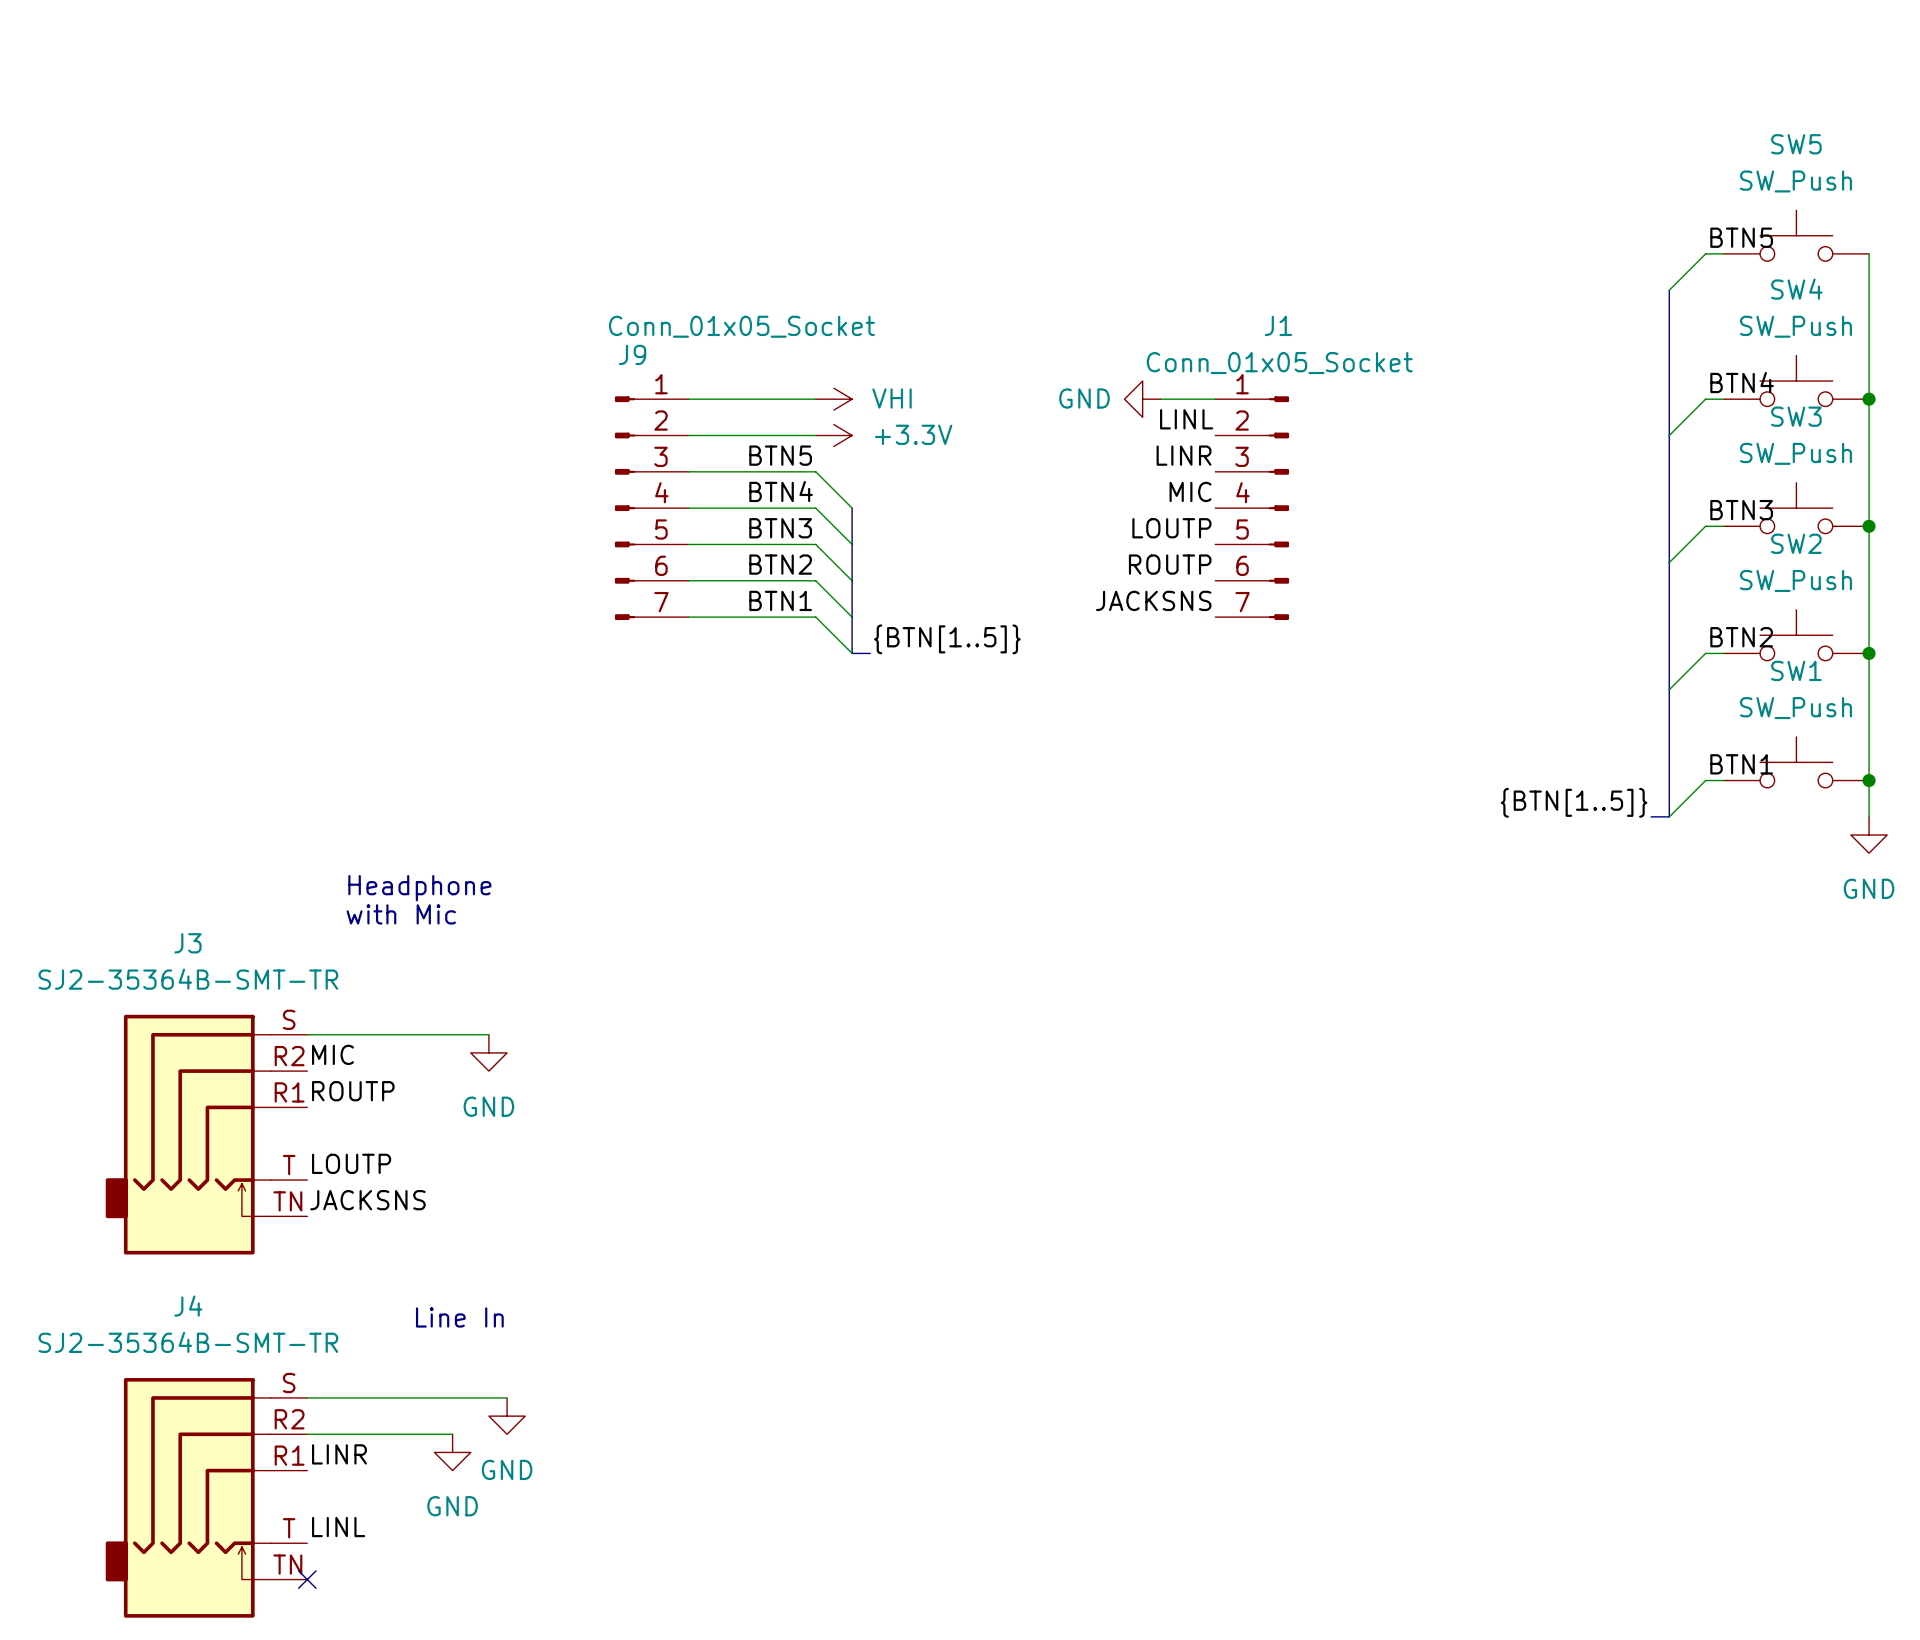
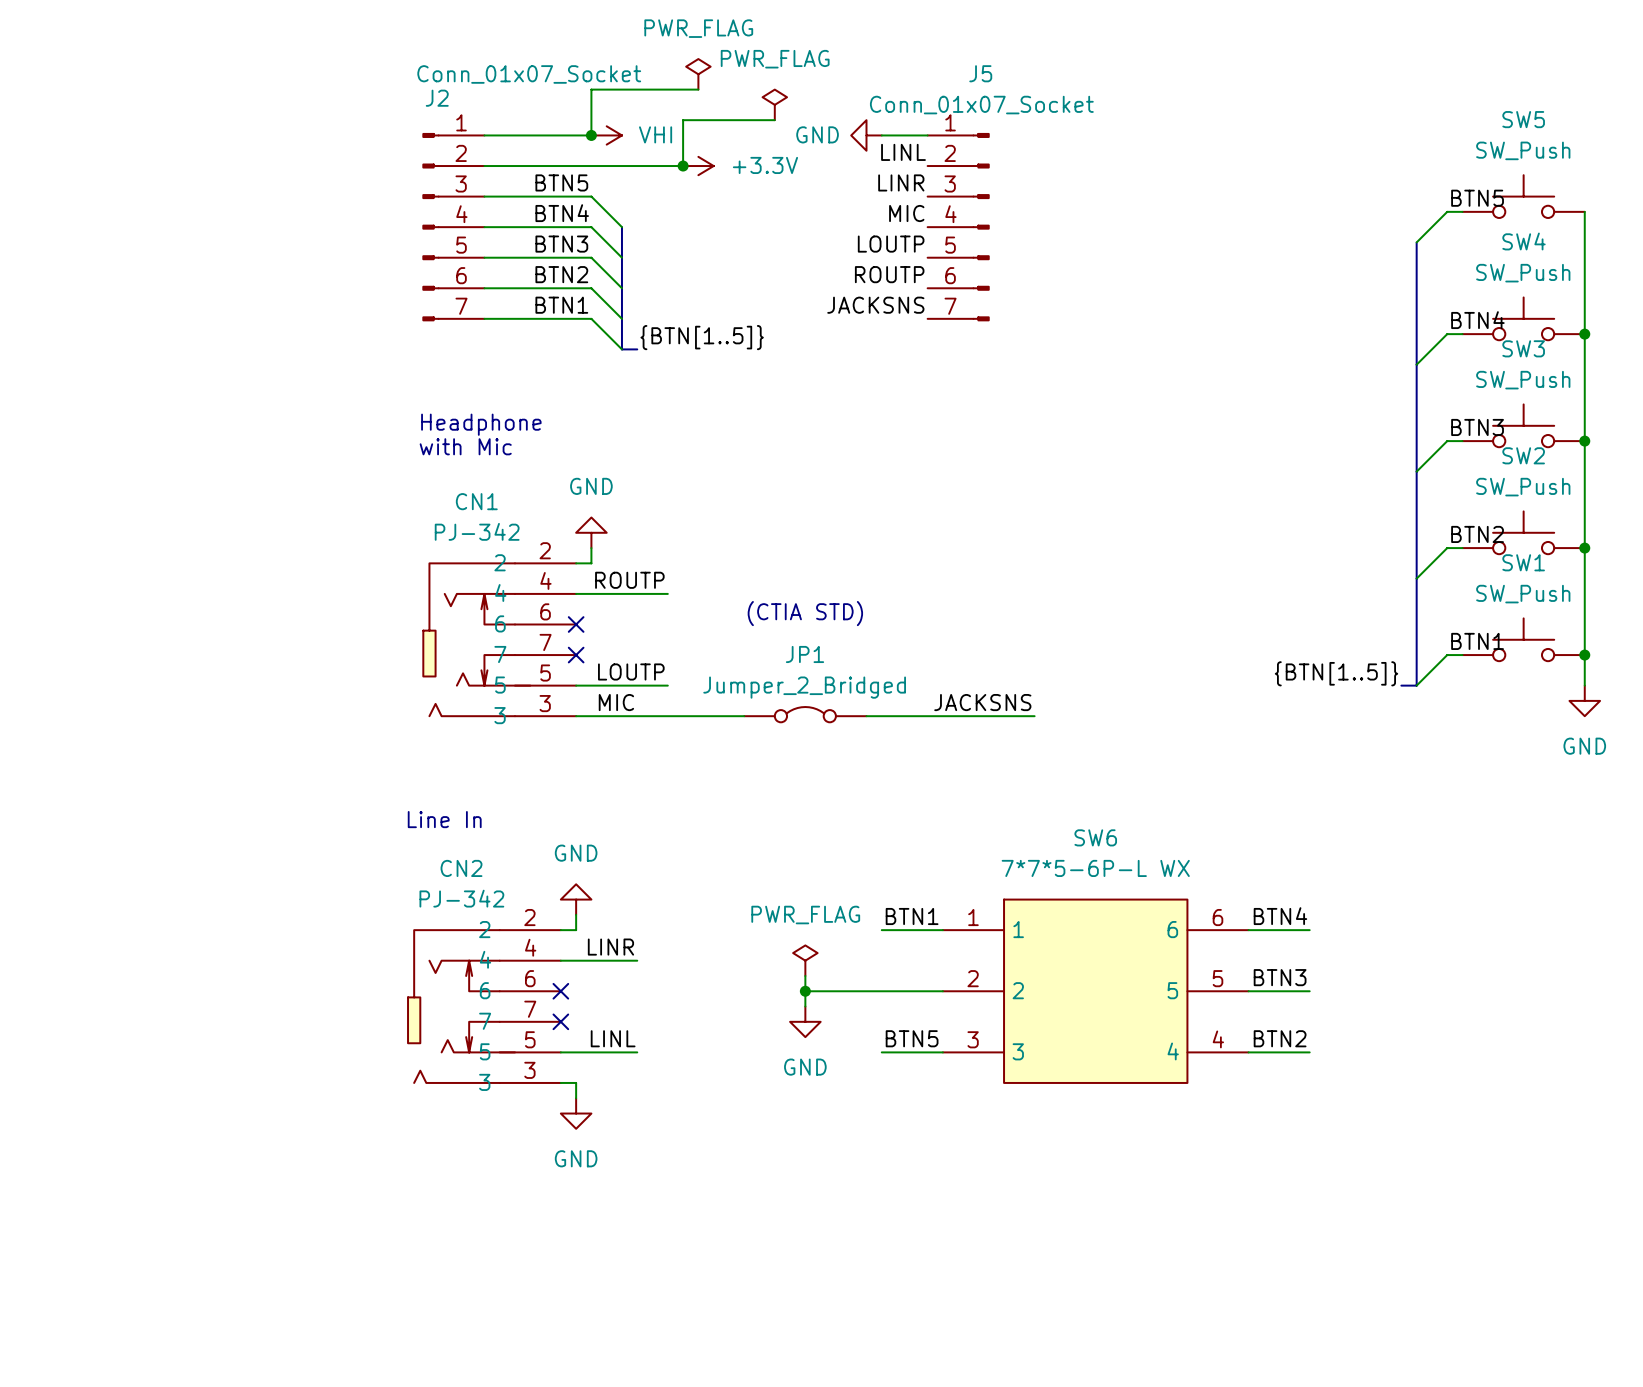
power symbol: none -> PWR_FLAG (698, 74)
wire: none -> (698, 89) (591, 89) (591, 135) (484, 135)
power symbol: none -> PWR_FLAG (774, 104)
wire: none -> (774, 120) (683, 120) (683, 166) (484, 166)
junction: none -> (591, 135)
power symbol: none -> GND (866, 135)
junction: none -> (683, 166)
J2: none -> Conn_01x07_Socket (453, 227)
J5: none -> Conn_01x07_Socket (958, 227)
label: none -> LOUTP (891, 244)
label: none -> ROUTP (889, 274)
label: none -> JACKSNS (875, 305)
wire: (688, 399) (815, 399) -> none
power symbol position: VHI (833, 399) -> VHI (606, 135)
power symbol: GND (1142, 399) -> none
wire: (1160, 399) (1215, 399) -> (881, 135) (927, 135)
label position: LINL (1186, 419) -> LINL (903, 152)
wire: (688, 435) (815, 435) -> none
power symbol position: +3.3V (833, 435) -> +3.3V (698, 166)
label position: BTN5 (780, 455) -> BTN5 (561, 182)
label position: LINR (1184, 455) -> LINR (901, 182)
wire: (688, 471) (815, 471) (852, 508) -> (484, 196) (591, 196) (621, 227)
label position: BTN4 (781, 491) -> BTN4 (562, 213)
label position: MIC (1190, 491) -> MIC (906, 213)
text: none -> Headphone (481, 424)
J9: Conn_01x05_Socket (651, 508) -> none
wire: (688, 508) (815, 508) (852, 544) -> (484, 227) (591, 227) (621, 257)
bus: (852, 508) (852, 653) (870, 653) -> (621, 227) (621, 349) (637, 349)
J1: Conn_01x05_Socket (1252, 508) -> none
label position: BTN3 (780, 528) -> BTN3 (561, 244)
label: LOUTP (1171, 528) -> none
text: none -> with Mic (465, 446)
wire: (688, 544) (815, 544) (852, 580) -> (484, 257) (591, 257) (621, 288)
label position: BTN2 (780, 564) -> BTN2 (561, 274)
label: ROUTP (1170, 564) -> none
wire: (688, 580) (815, 580) (852, 617) -> (484, 288) (591, 288) (621, 318)
label position: BTN1 (780, 600) -> BTN1 (561, 305)
label: JACKSNS (1153, 600) -> none
wire: (688, 617) (815, 617) (852, 653) -> (484, 318) (591, 318) (621, 349)
power symbol: none -> GND (591, 532)
label position: {BTN[1..5]} (947, 639) -> {BTN[1..5]} (702, 337)
wire: none -> (591, 548) (591, 563) (576, 563)
label: none -> ROUTP (629, 580)
wire: none -> (576, 593) (667, 593)
text: none -> (CTIA STD) (805, 613)
no-connect mark: none -> (576, 624)
CN1: none -> PJ-342 (499, 639)
no-connect mark: none -> (576, 655)
label: none -> LOUTP (631, 671)
wire: none -> (576, 685) (667, 685)
label: none -> MIC (616, 702)
label: none -> JACKSNS (982, 702)
JP1: none -> Jumper_2_Bridged (805, 714)
wire: none -> (576, 716) (744, 716)
wire: none -> (866, 716) (1034, 716)
text: Headphone (419, 888) -> none
text: with Mic (401, 914) -> none
wire: (307, 1034) (488, 1034) -> none
power symbol: GND (488, 1052) -> none
label: MIC (332, 1054) -> none
power symbol: none -> GND (576, 899)
wire: none -> (576, 914) (576, 930) (560, 930)
label: none -> BTN4 (1280, 916)
label: ROUTP (353, 1091) -> none
label: none -> BTN1 (912, 916)
wire: none -> (881, 930) (942, 930)
wire: none -> (1248, 930) (1309, 930)
label: none -> LINR (610, 947)
J3: SJ2-35364B-SMT-TR (206, 1134) -> none
wire: none -> (560, 960) (637, 960)
power symbol: none -> PWR_FLAG (805, 960)
wire: none -> (805, 975) (805, 1006)
label: LOUTP (351, 1163) -> none
label: none -> BTN3 (1280, 977)
no-connect mark: none -> (560, 991)
wire: none -> (805, 991) (942, 991)
junction: none -> (805, 991)
SW6: none -> 7*7*5-6P-L WX (1095, 991)
wire: none -> (1248, 991) (1309, 991)
CN2: none -> PJ-342 (484, 1006)
label: JACKSNS (367, 1200) -> none
no-connect mark: none -> (560, 1021)
power symbol: none -> GND (805, 1021)
label: none -> LINL (613, 1038)
label: none -> BTN5 (912, 1038)
label: none -> BTN2 (1280, 1038)
wire: none -> (560, 1052) (637, 1052)
wire: none -> (881, 1052) (942, 1052)
wire: none -> (1248, 1052) (1309, 1052)
wire: none -> (560, 1082) (576, 1082) (576, 1098)
text position: Line In (459, 1317) -> Line In (444, 819)
power symbol: none -> GND (576, 1113)
wire: (307, 1397) (507, 1397) -> none
power symbol: GND (507, 1416) -> none
wire: (307, 1434) (452, 1434) -> none
power symbol: GND (452, 1452) -> none
label: LINR (339, 1454) -> none
J4: SJ2-35364B-SMT-TR (206, 1497) -> none
label: LINL (338, 1527) -> none
no-connect mark: (307, 1579) -> none

